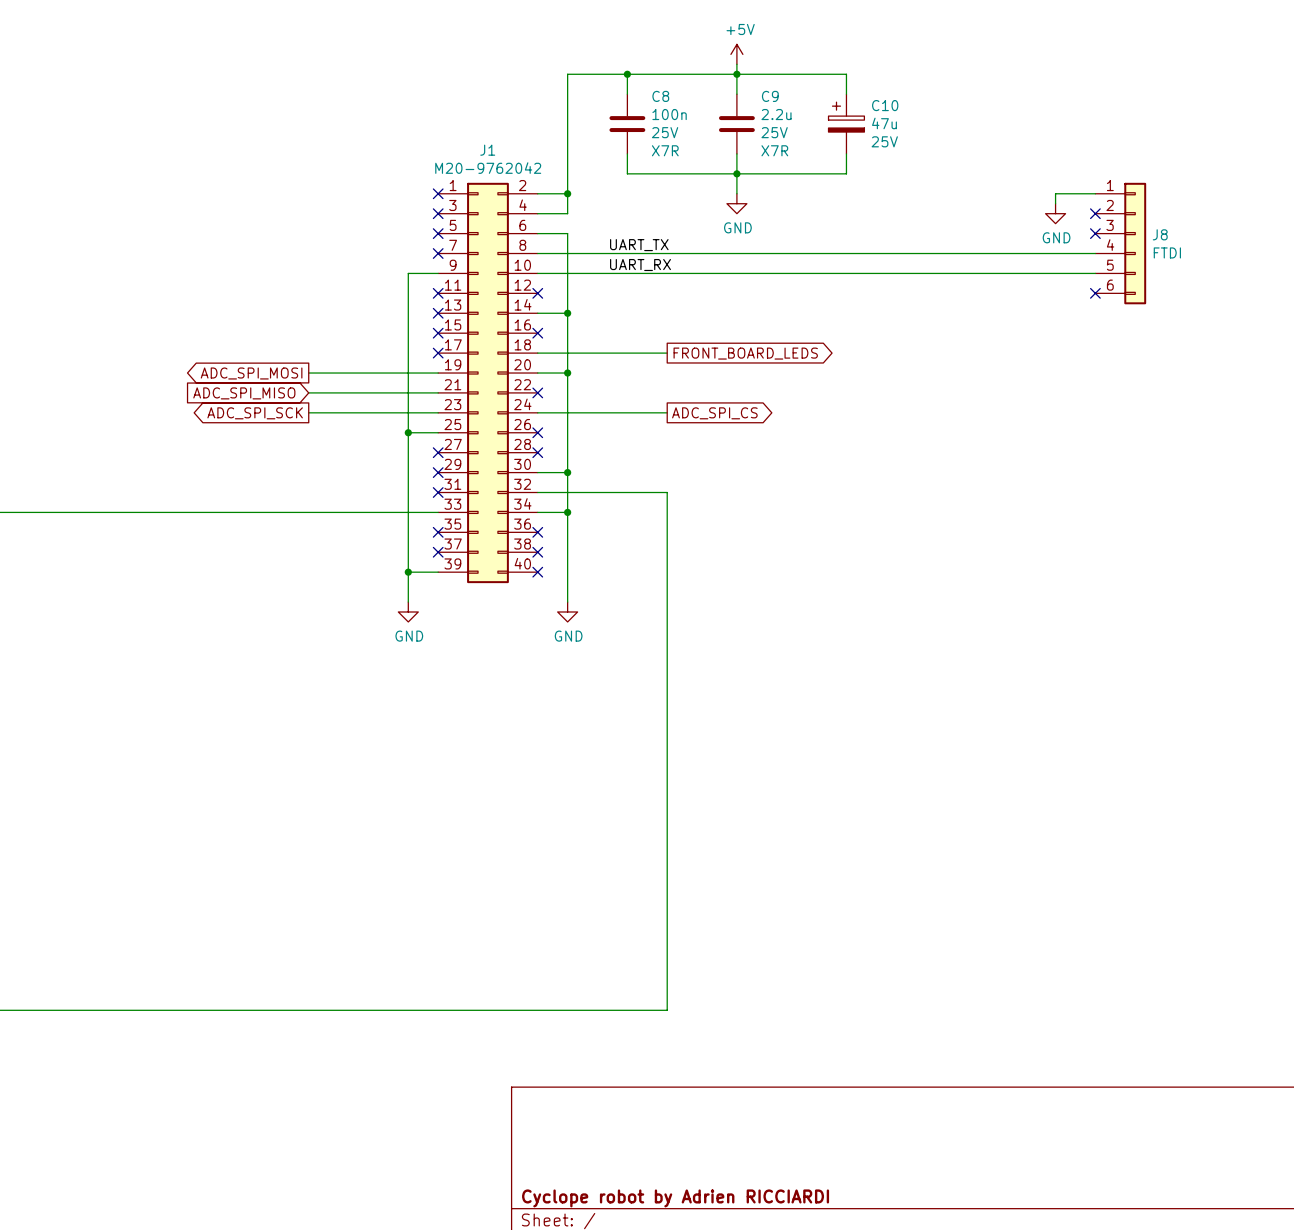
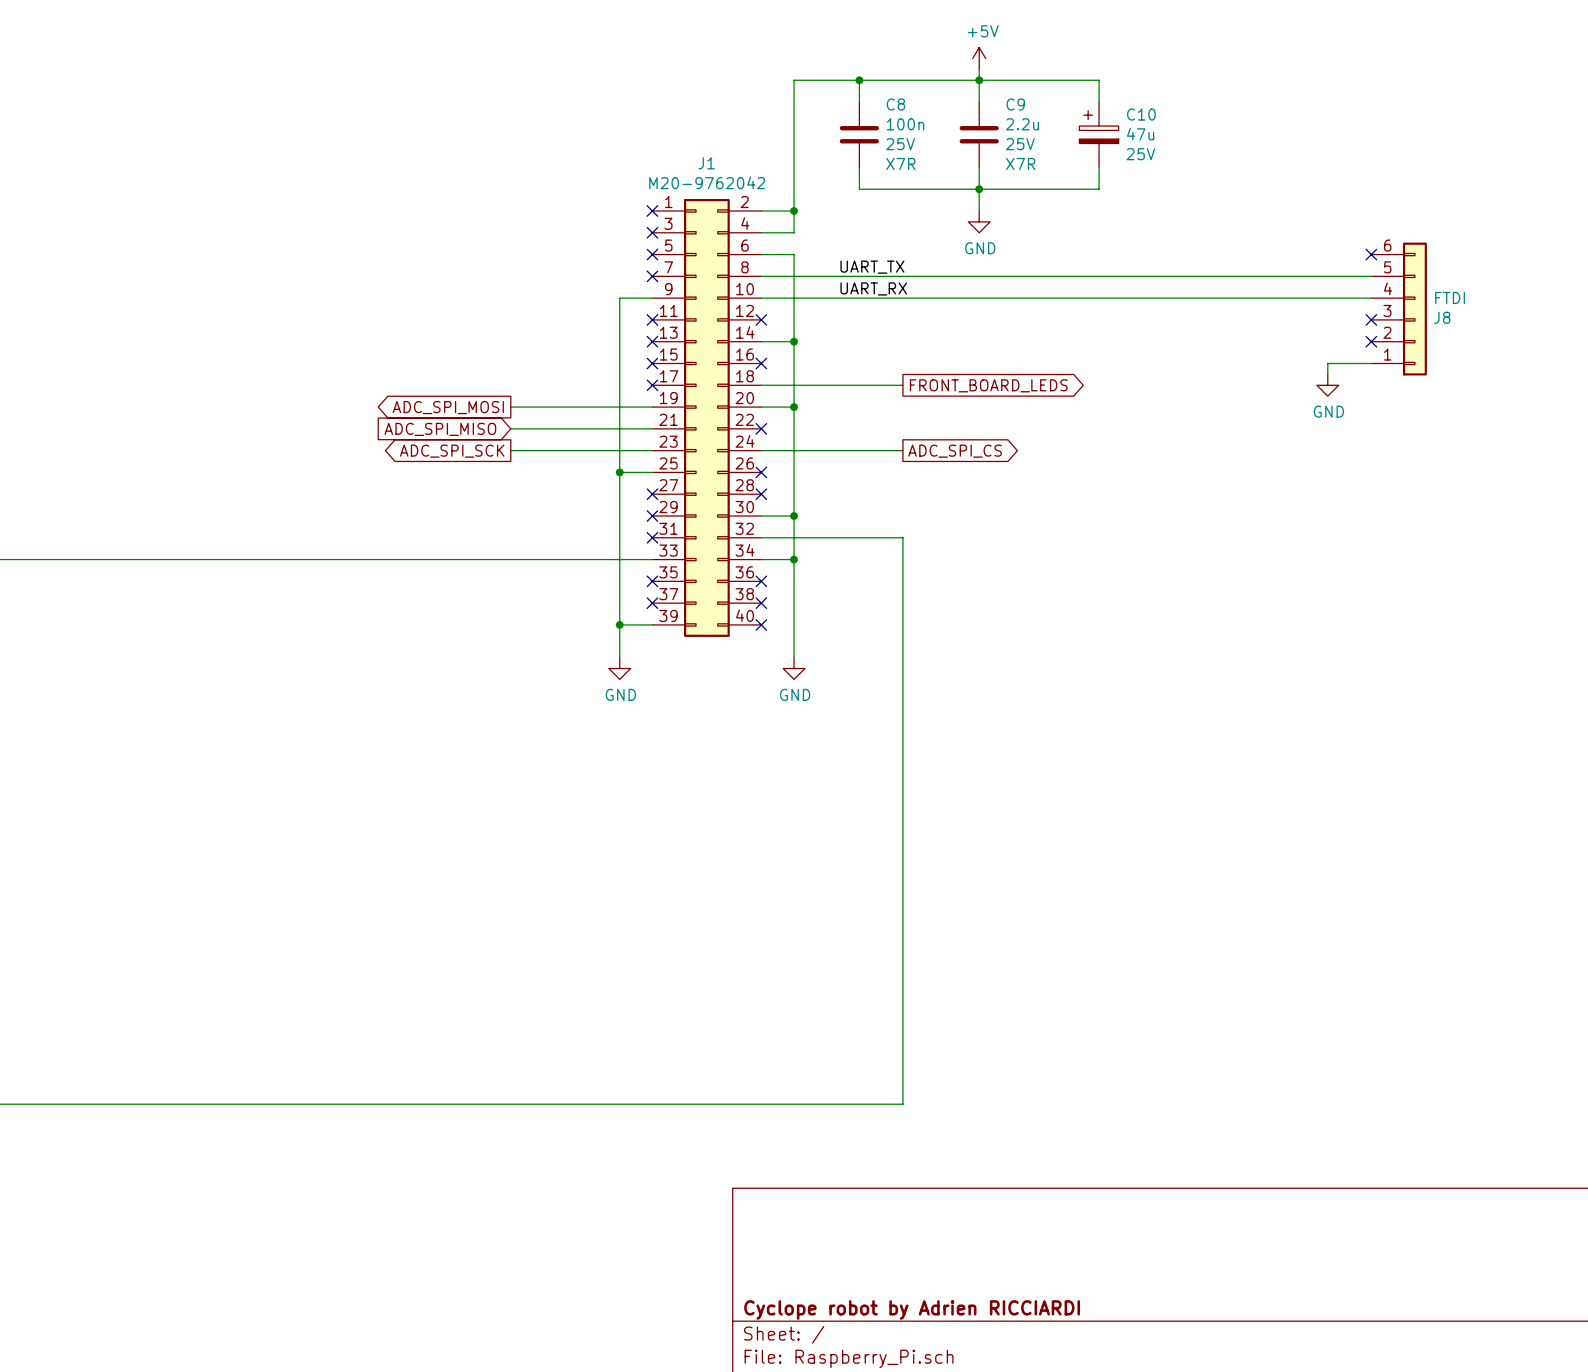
wire: (1095, 193) (1055, 193) (1055, 203) -> (1371, 363) (1327, 363) (1327, 374)
power symbol position: GND (1055, 213) -> GND (1327, 385)
no-connect mark: (1095, 213) -> none
J8 flip: as is (1135, 243) -> up-down (1414, 309)
no-connect mark: none -> (1371, 341)

